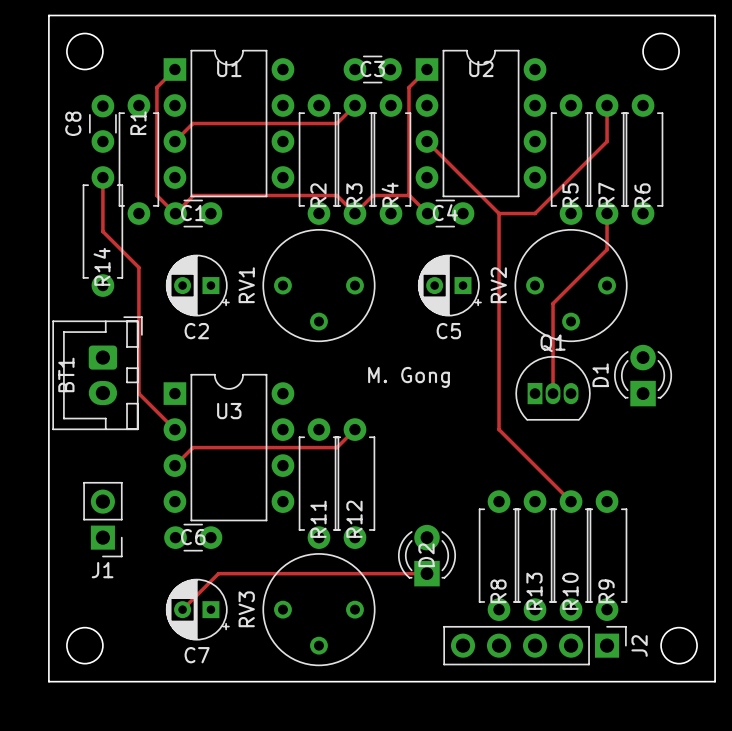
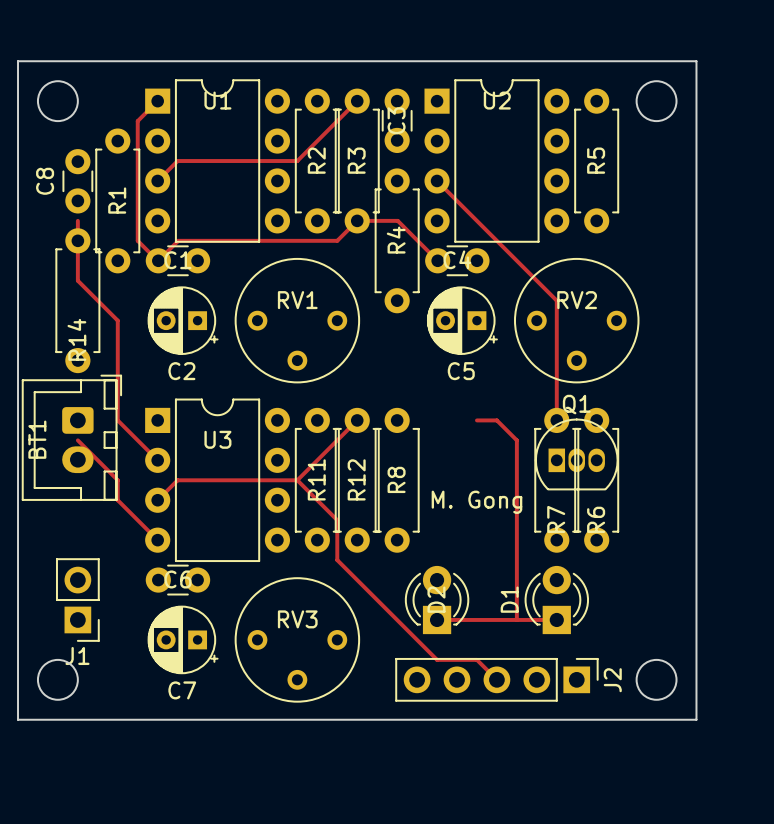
board edge: (48, 33) (48, 15) (715, 15) (715, 681) (48, 681) (48, 627) -> (18, 61) (696, 61) (696, 719) (18, 719)
round board edge position: (84, 51) -> (57, 101)
round board edge position: (661, 51) -> (656, 101)
C3 rotation: 0° (372, 69) -> 90° clockwise (397, 120)
track: (427, 69) (409, 87) (409, 195) -> none
track: (354, 105) (336, 123) (300, 123) -> (357, 101) (297, 161)
track: (607, 105) (607, 141) (535, 213) (499, 213) (499, 375) -> (476, 420) (496, 420) (516, 440)
C8 position: (102, 123) -> (77, 181)
R1 name position: R1 (138, 123) -> R1 (117, 200)
R2 position: (318, 159) -> (317, 161)
R3 position: (354, 159) -> (357, 161)
R4 position: (390, 159) -> (397, 240)
R5 position: (571, 159) -> (596, 161)
R7 position: (607, 159) -> (556, 480)
R6 position: (643, 159) -> (596, 480)
R2 name position: R2 (318, 195) -> R2 (316, 160)
track: (336, 195) (354, 213) (372, 195) (409, 195) -> (337, 240) (357, 220) (397, 220) (417, 240)
R3 name position: R3 (354, 195) -> R3 (356, 160)
R5 name position: R5 (570, 195) -> R5 (596, 160)
track: none -> (516, 260) (556, 300) (556, 420)
track: (607, 213) (607, 249) (553, 303) (553, 393) -> none
R14 position: (102, 231) -> (77, 300)
C2 position: (197, 285) -> (183, 320)
RV1 name rotation: 0° (246, 285) -> 90° clockwise (297, 300)
RV1 name position: RV1 (246, 285) -> RV1 (297, 300)
RV1 position: (318, 285) -> (297, 320)
C5 position: (449, 285) -> (462, 320)
RV2 name rotation: 0° (498, 285) -> 90° clockwise (577, 300)
RV2 name position: RV2 (498, 285) -> RV2 (577, 300)
RV2 position: (571, 285) -> (576, 320)
track: (138, 357) (138, 393) (174, 429) -> (117, 420) (157, 460)
track: none -> (357, 420) (297, 480)
D1 position: (643, 375) -> (556, 600)
text position: M. Gong (409, 377) -> M. Gong (476, 502)
track: none -> (297, 480) (337, 520) (337, 560) (437, 659) (476, 659) (496, 679)
track: none -> (297, 480) (177, 480) (157, 500)
track: (354, 429) (336, 447) (192, 447) (174, 465) -> (77, 440) (117, 480) (117, 500) (157, 540)
track: (499, 429) (571, 501) -> (516, 500) (516, 619)
U3 position: (228, 447) -> (217, 480)
R11 position: (318, 483) -> (317, 480)
R12 position: (354, 483) -> (357, 480)
R11 name position: R11 (318, 519) -> R11 (316, 479)
R12 name position: R12 (354, 519) -> R12 (356, 479)
C6 position: (193, 537) -> (177, 580)
track: none -> (437, 619) (556, 619)
D2 position: (427, 555) -> (437, 600)
R8 position: (499, 555) -> (397, 480)
R13: (535, 555) -> none
R10: (571, 555) -> none
R9: (607, 555) -> none
track: (427, 573) (218, 573) (182, 609) -> none
R8 name position: R8 (498, 591) -> R8 (396, 479)
C7 position: (197, 609) -> (183, 639)
RV3 name rotation: 0° (246, 609) -> 90° clockwise (297, 619)
RV3 name position: RV3 (246, 609) -> RV3 (297, 619)
RV3 position: (318, 609) -> (297, 639)
round board edge position: (84, 645) -> (57, 679)
J2 position: (535, 645) -> (496, 679)
round board edge position: (679, 645) -> (656, 679)

